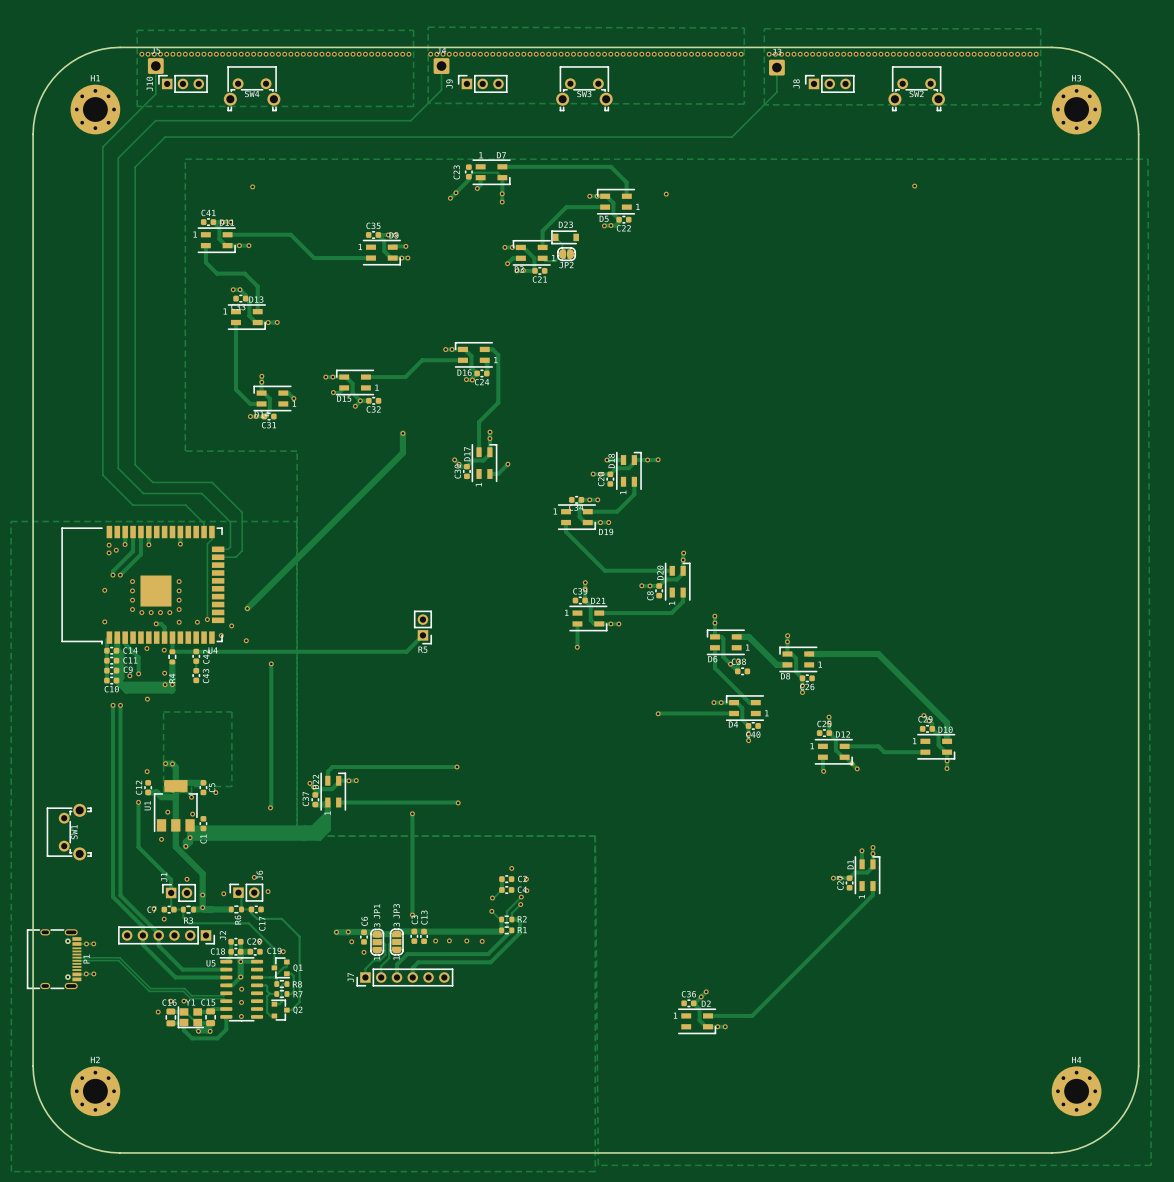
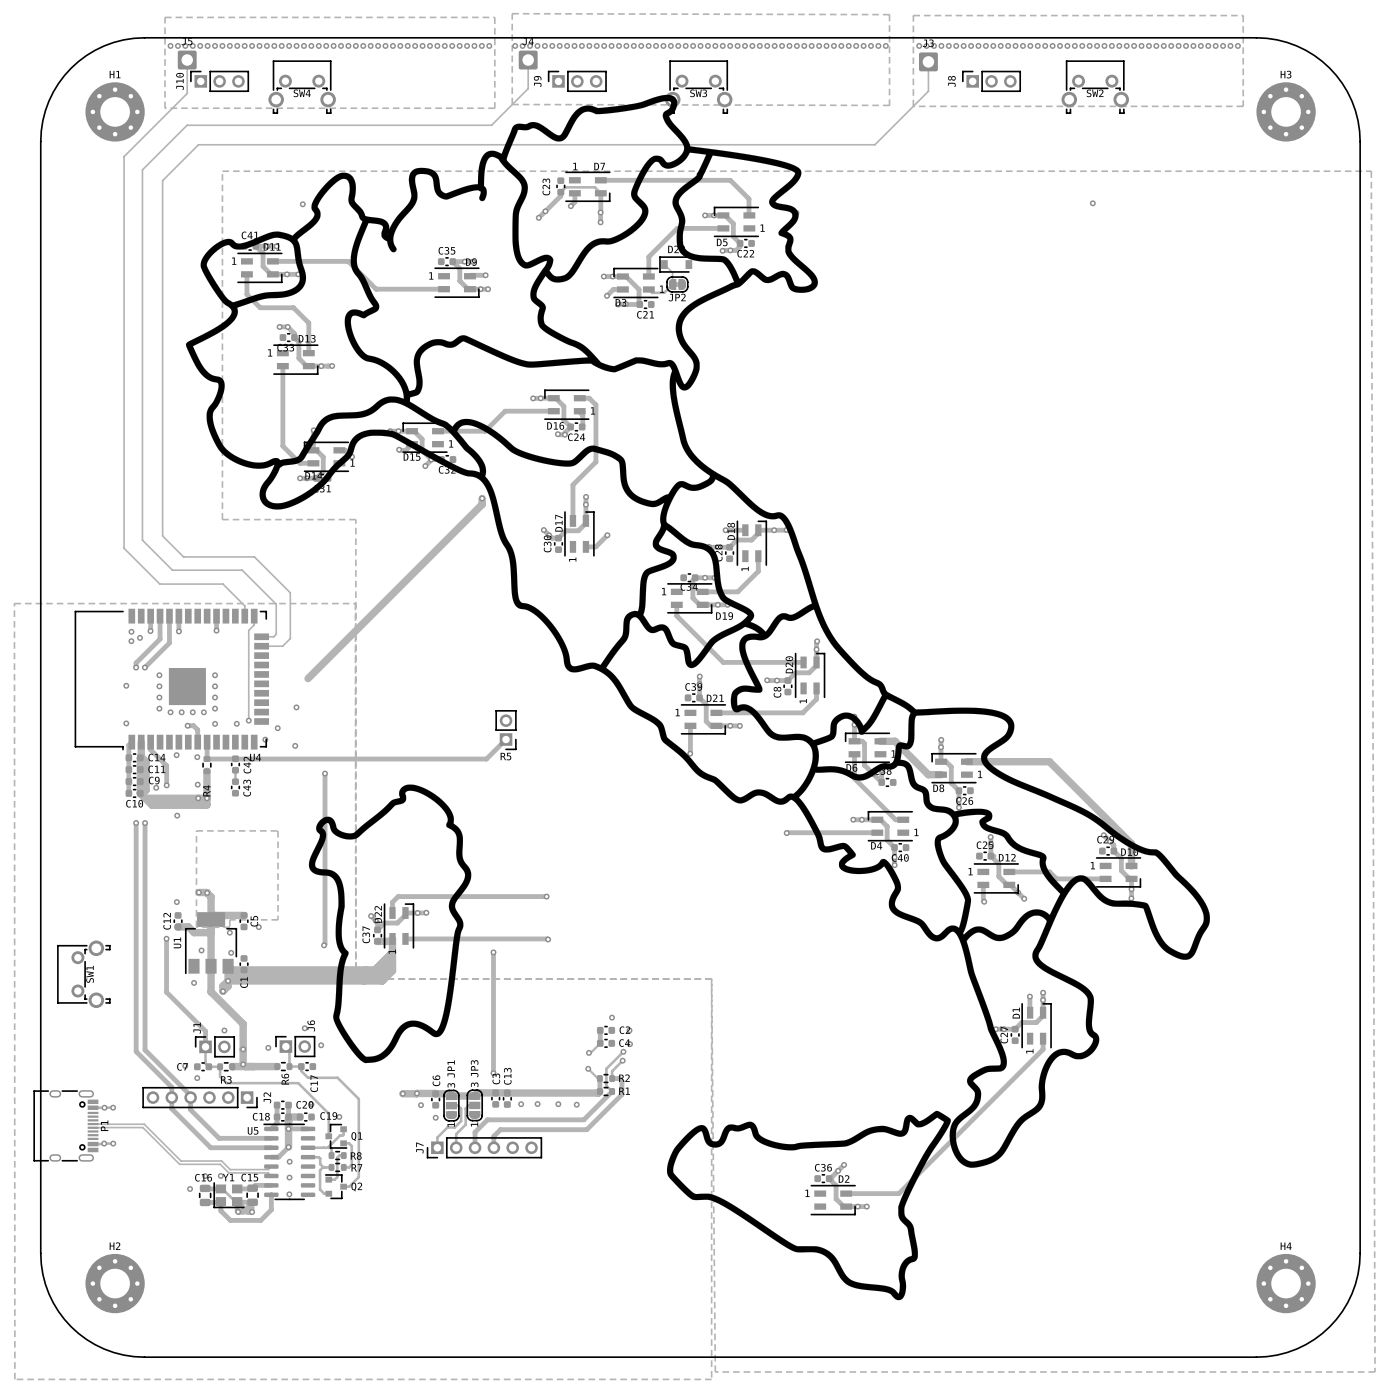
drawing: none -> [185, 94, 1210, 1301]
track: (402, 438) (402, 452) (247, 608) -> (482, 504) (308, 678)

